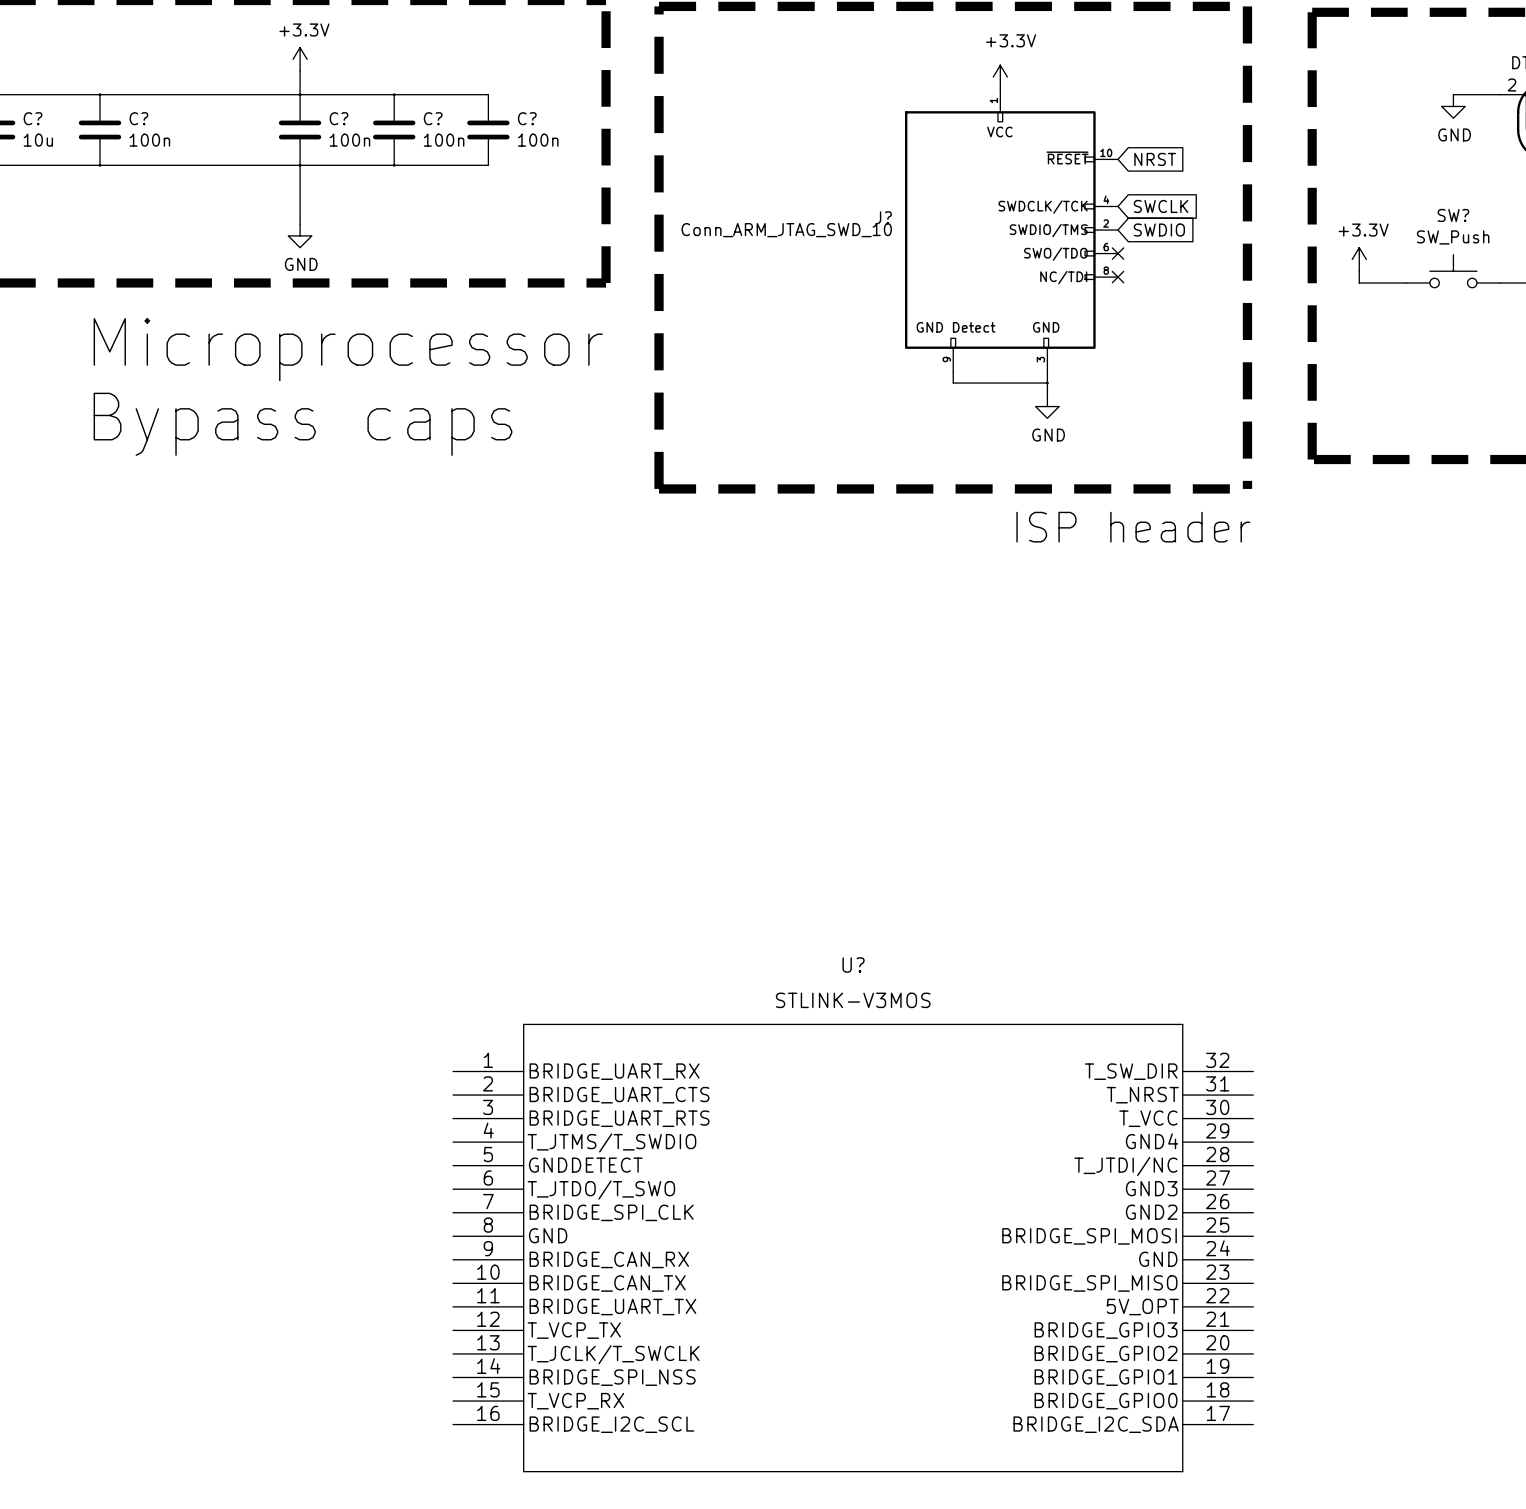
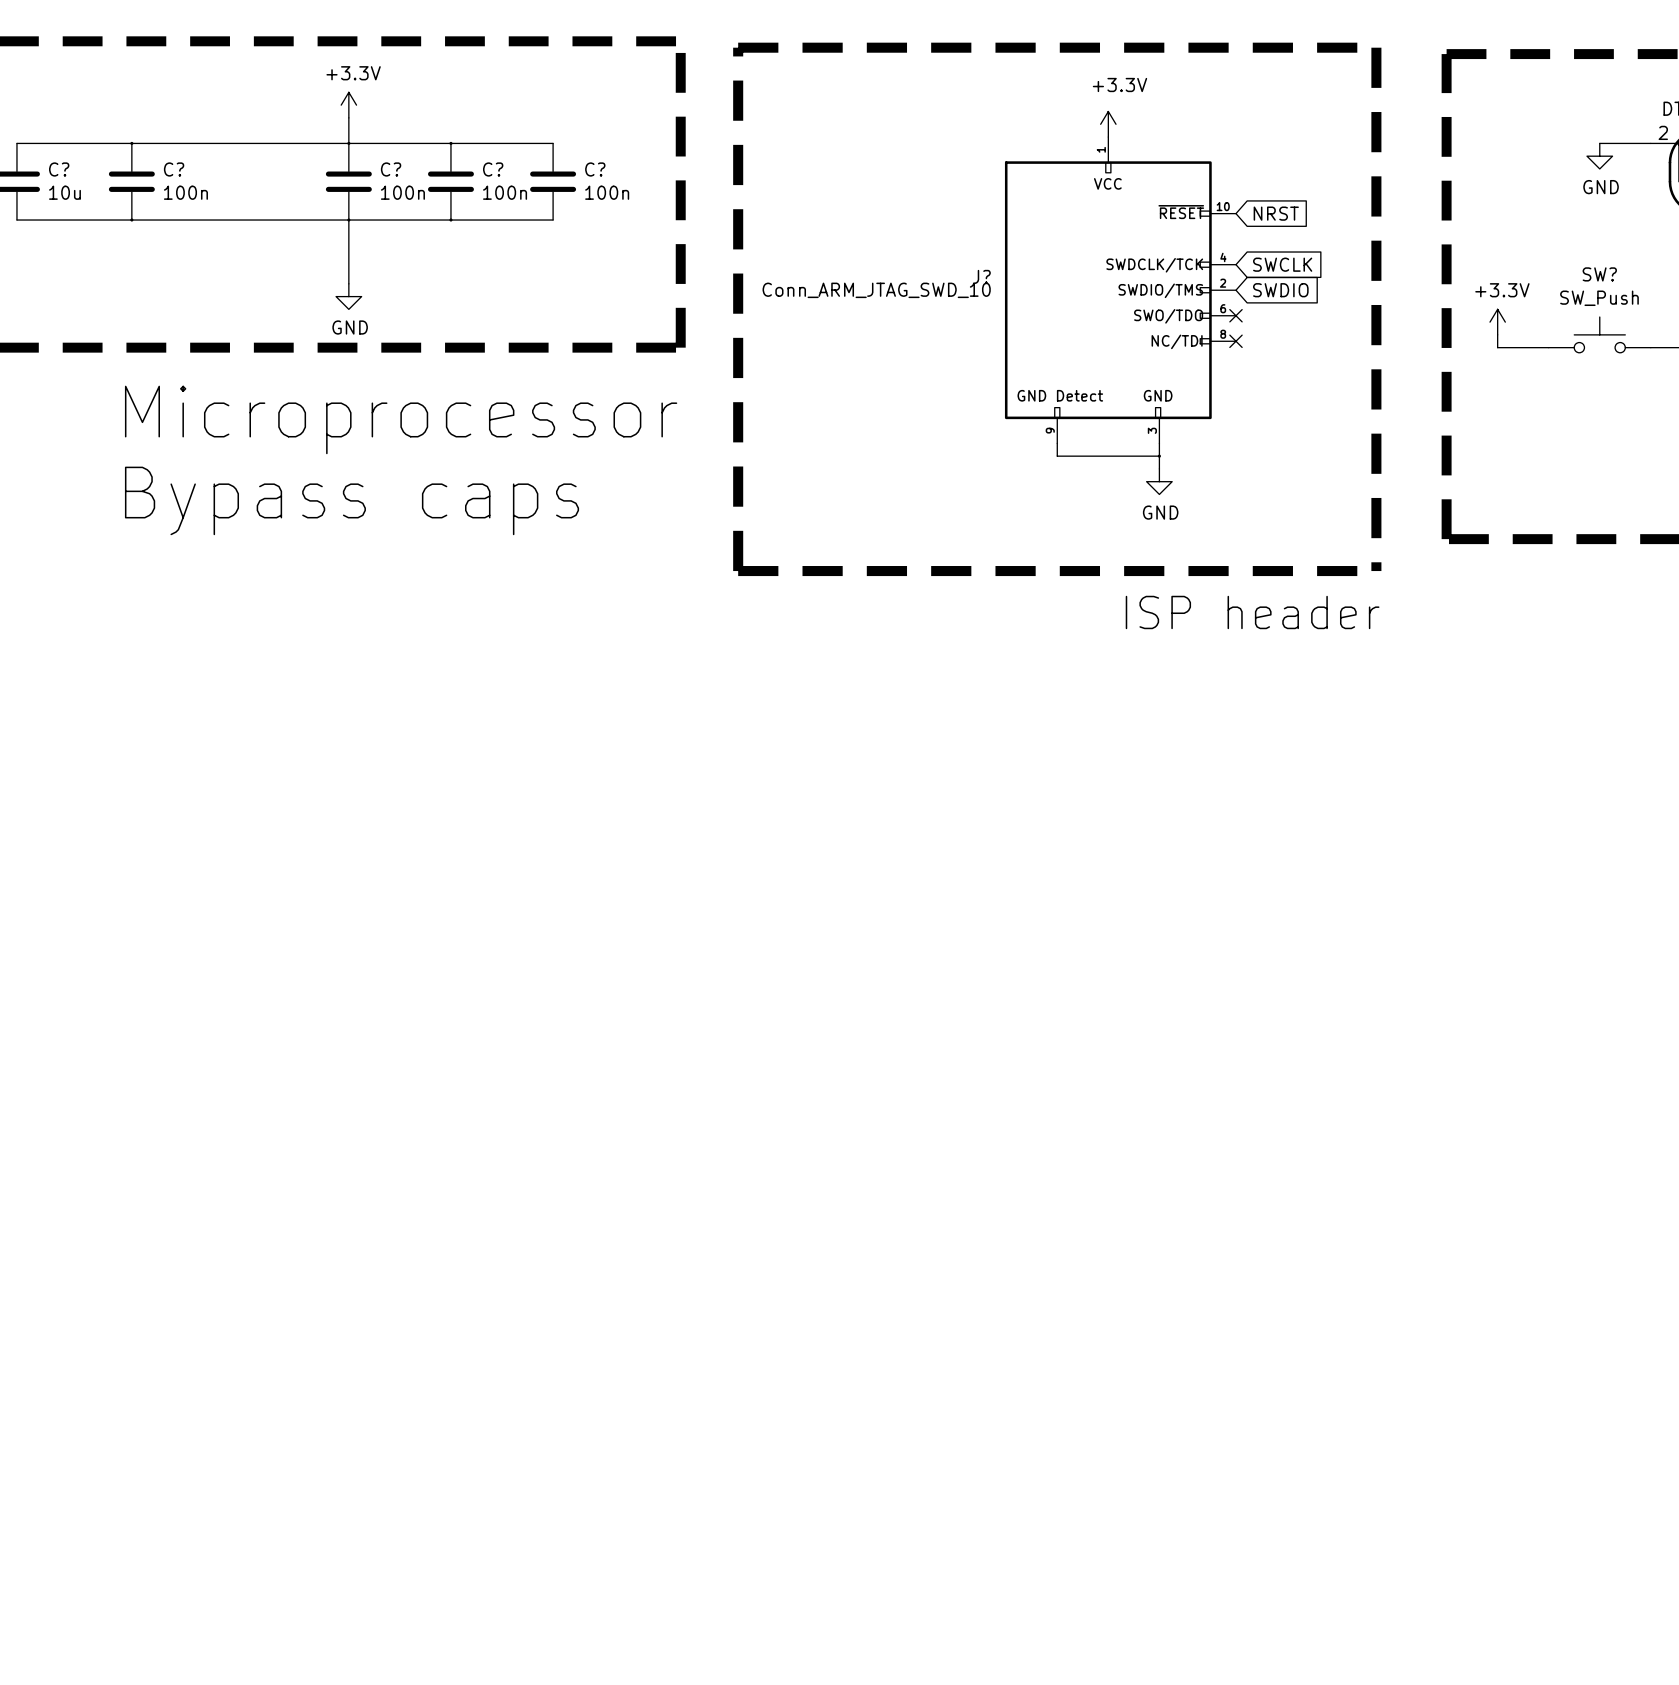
U?: STLINK-V3MOS (853, 1248) -> none

